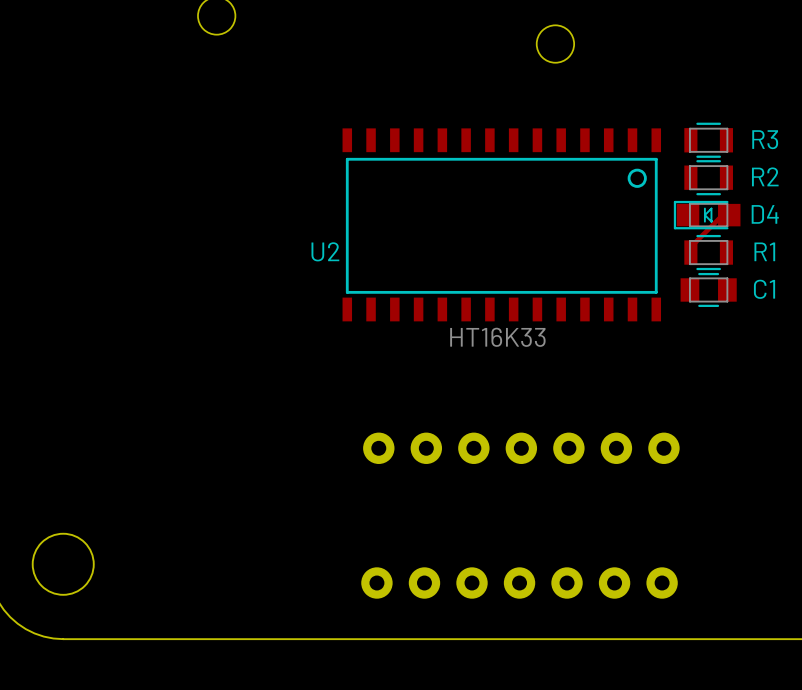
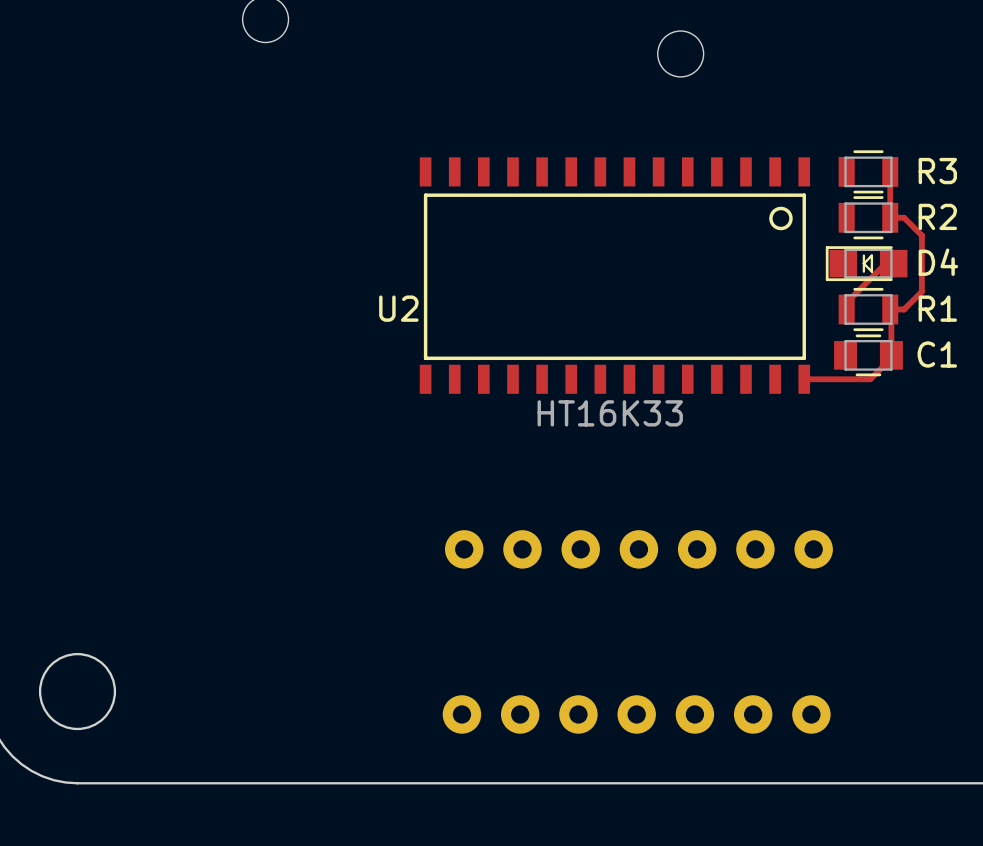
top track: none -> (890, 171) (890, 217) (904, 217) (921, 235) (921, 291) (904, 309) (890, 309) (891, 358) (870, 379) (804, 379)

